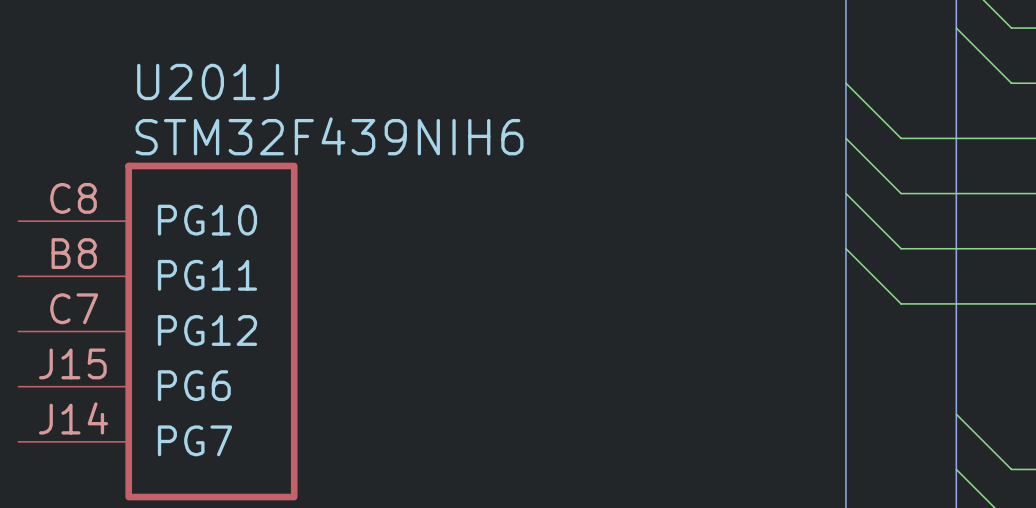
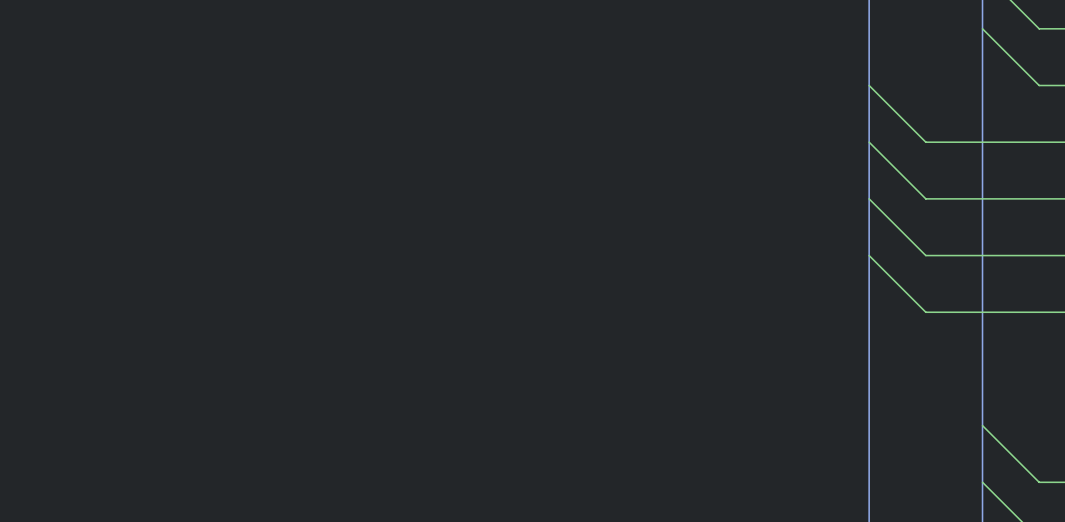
U201J: STM32F439NIH6 (157, 331) -> none

